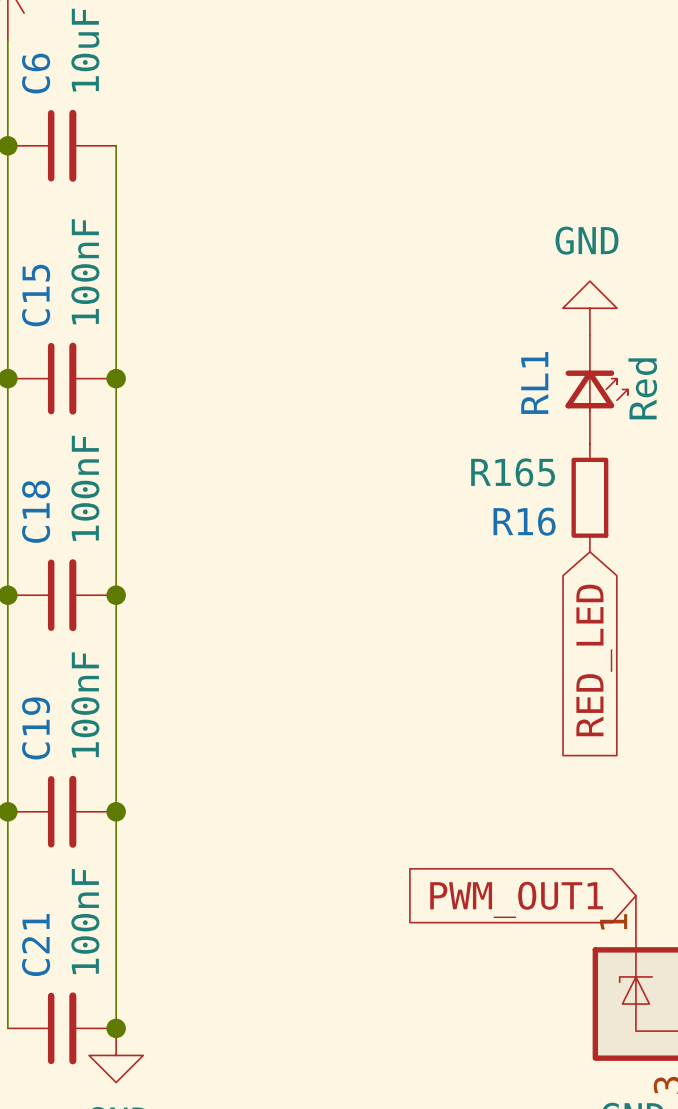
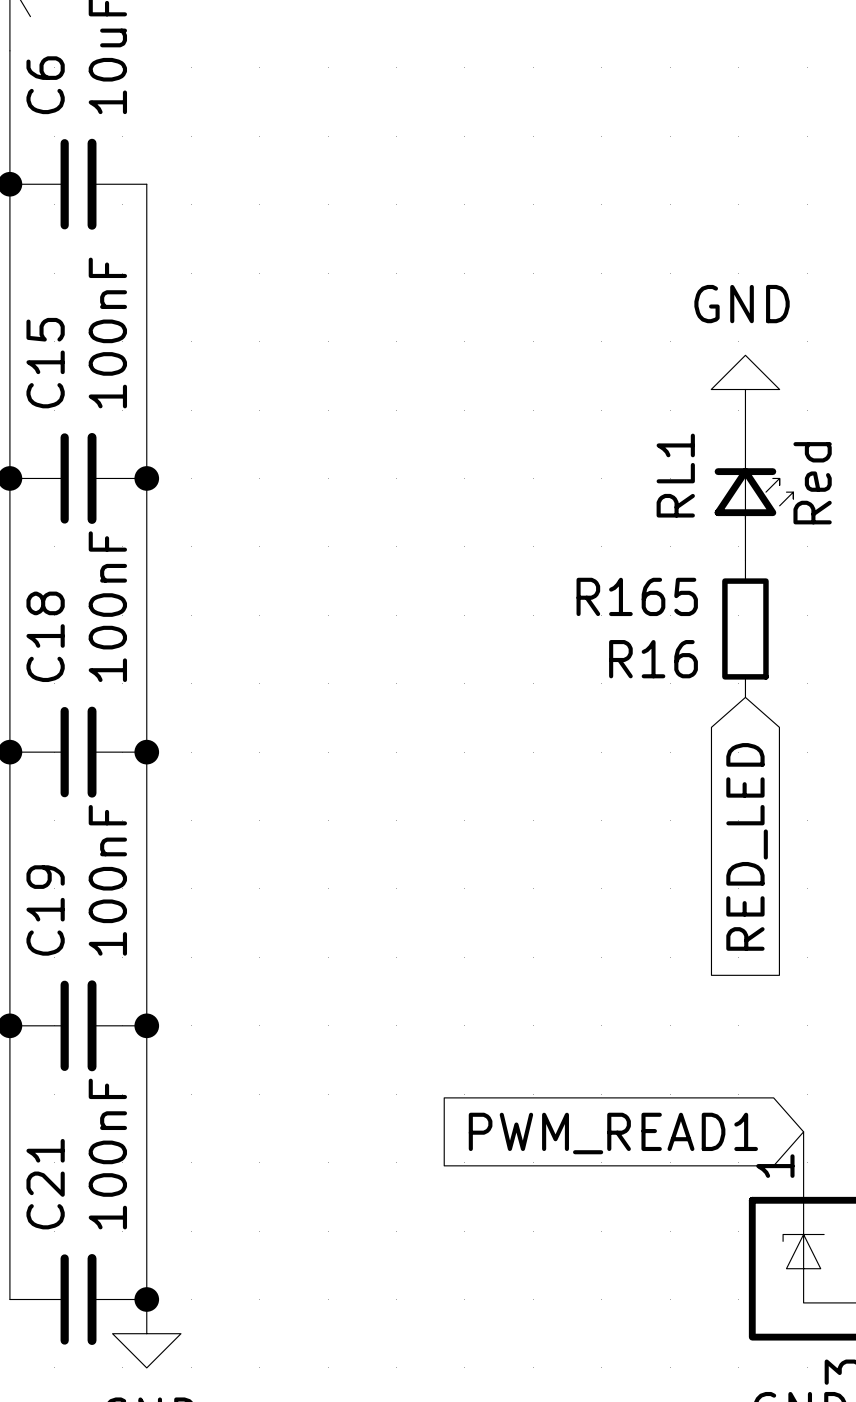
global label: PWM_OUT1 (516, 899) -> PWM_READ1 (613, 1133)

